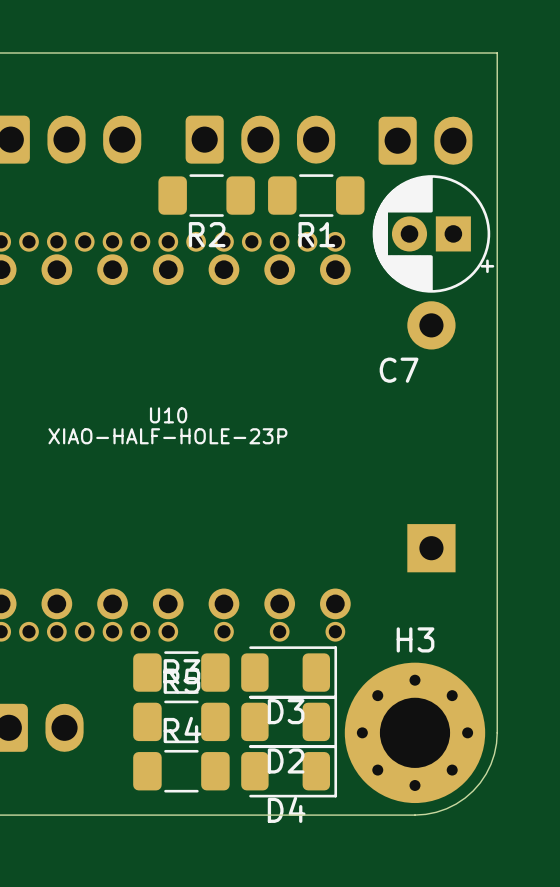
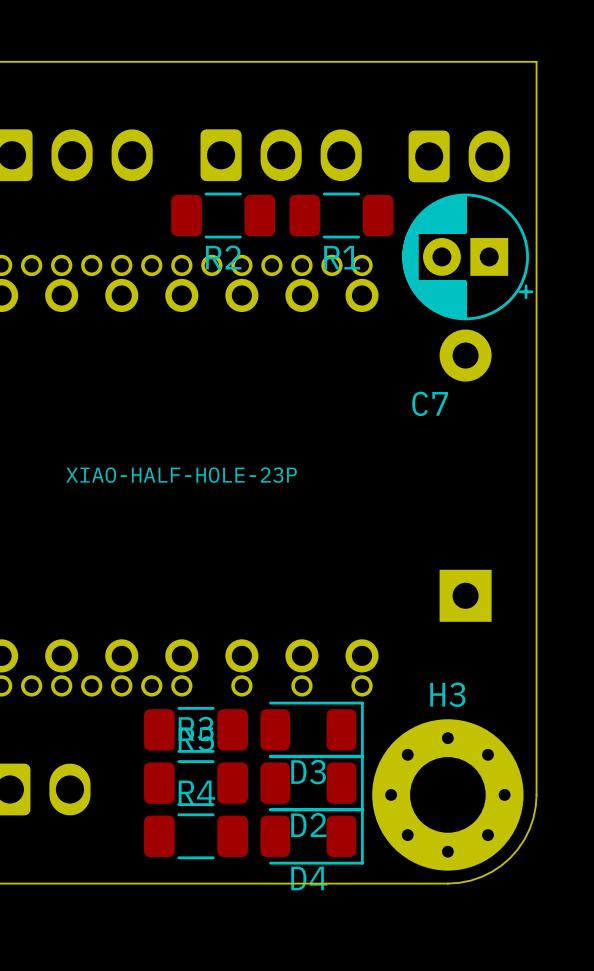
U10 name: U10 (168, 415) -> none

